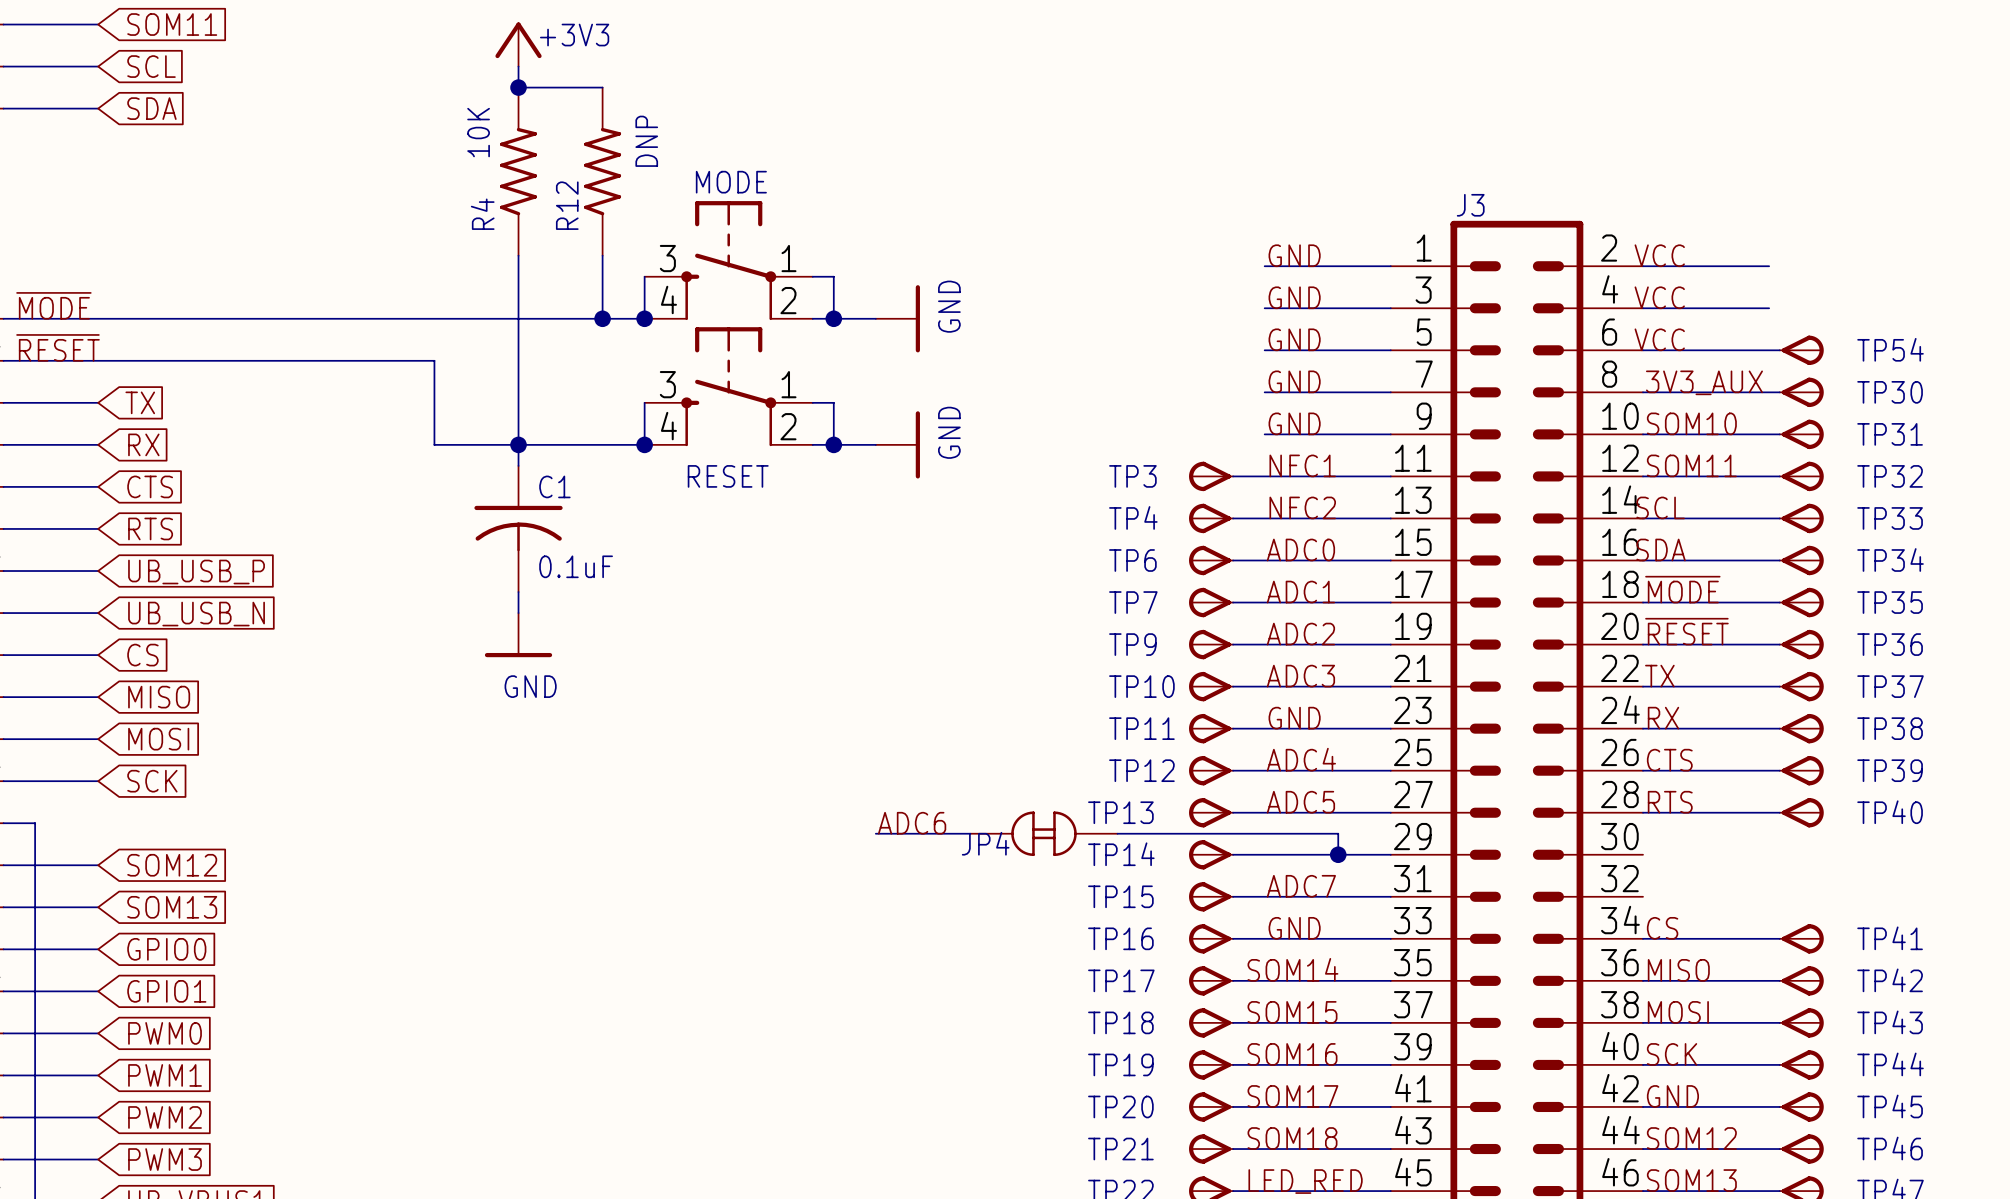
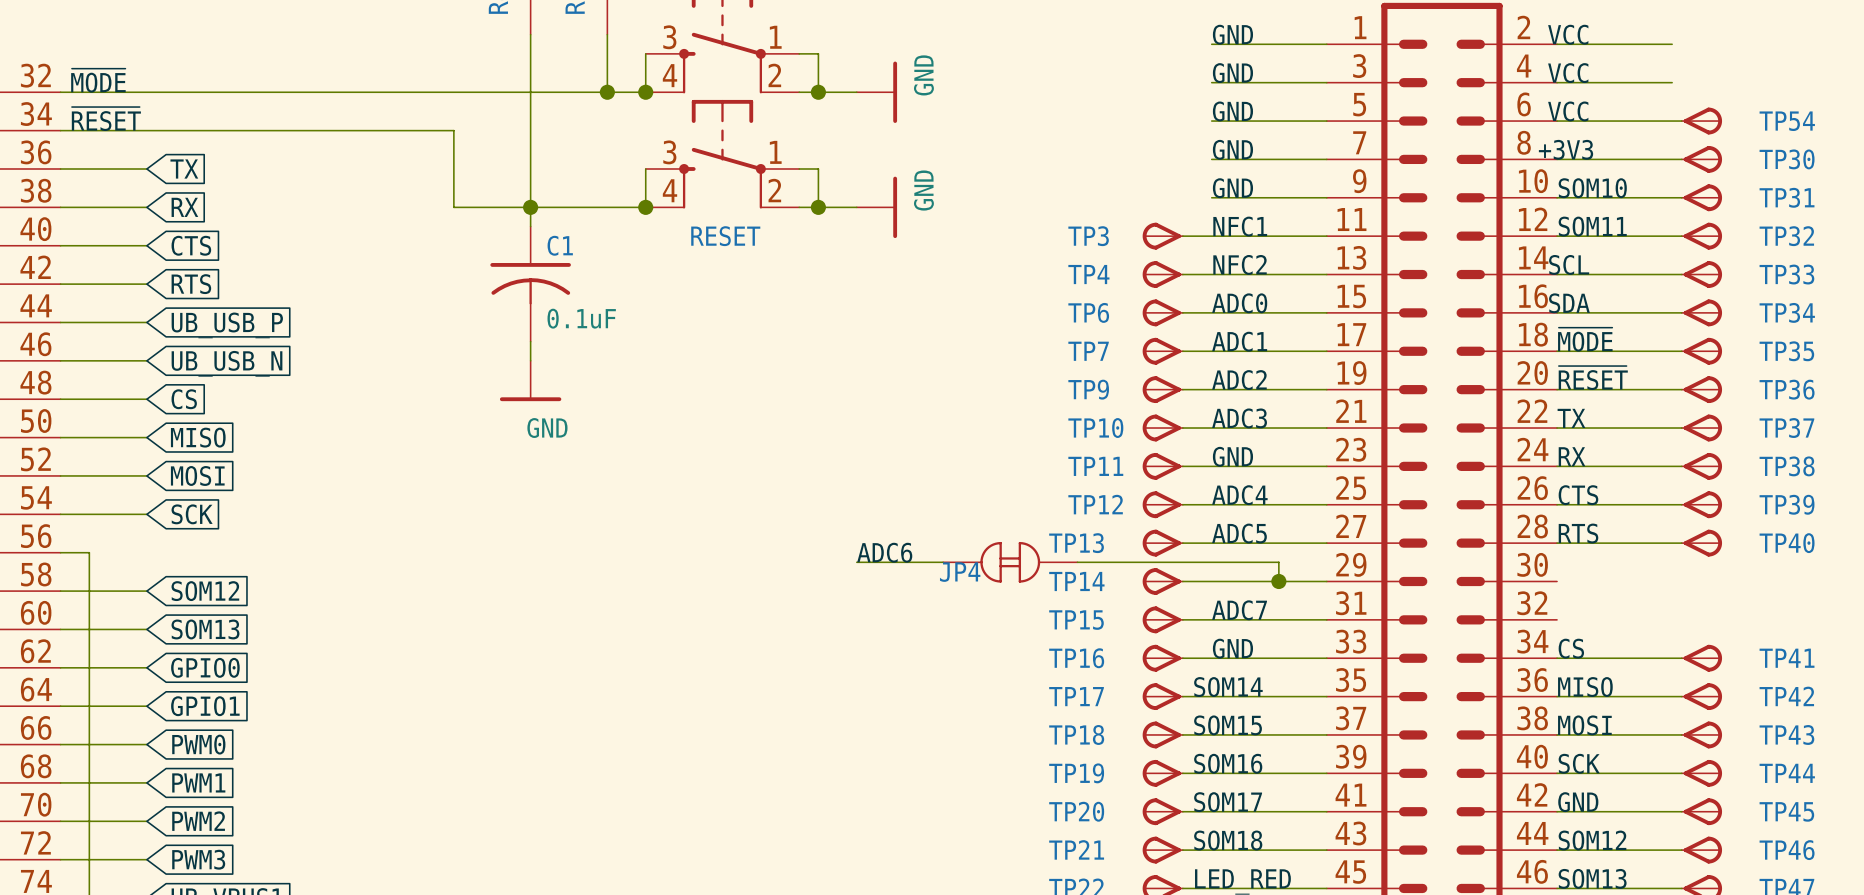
label: none -> +3V3 (1566, 149)
label: 3V3_AUX (1704, 382) -> none

